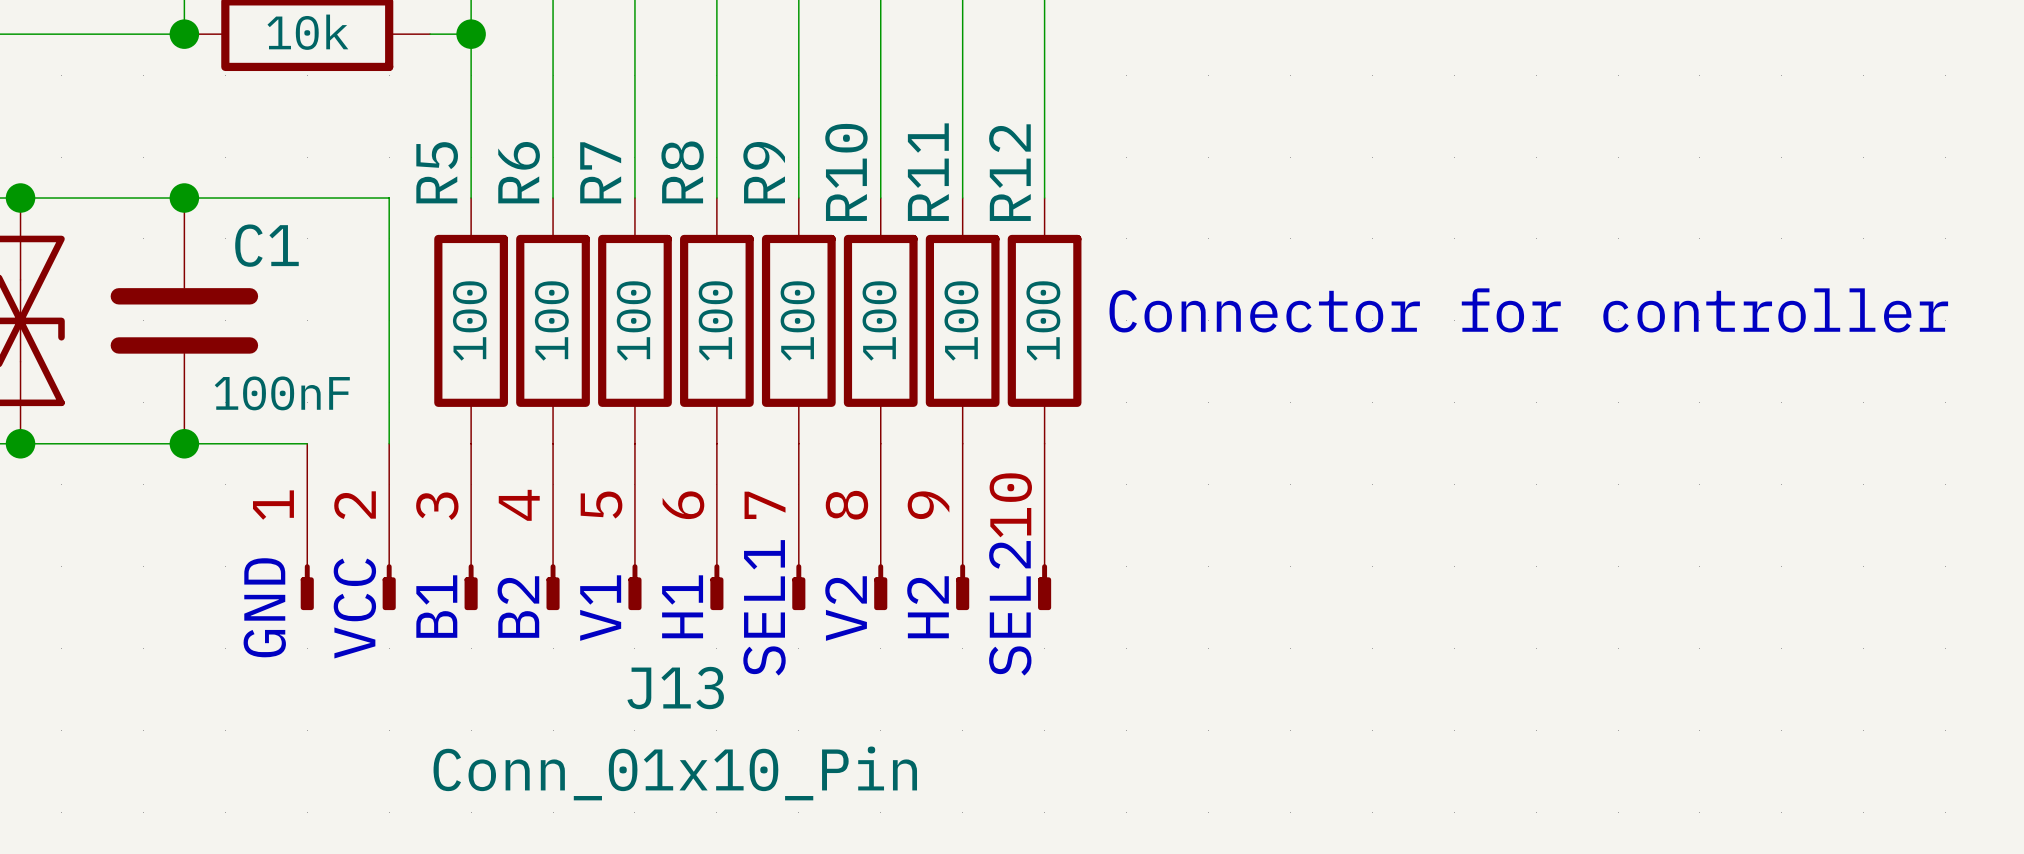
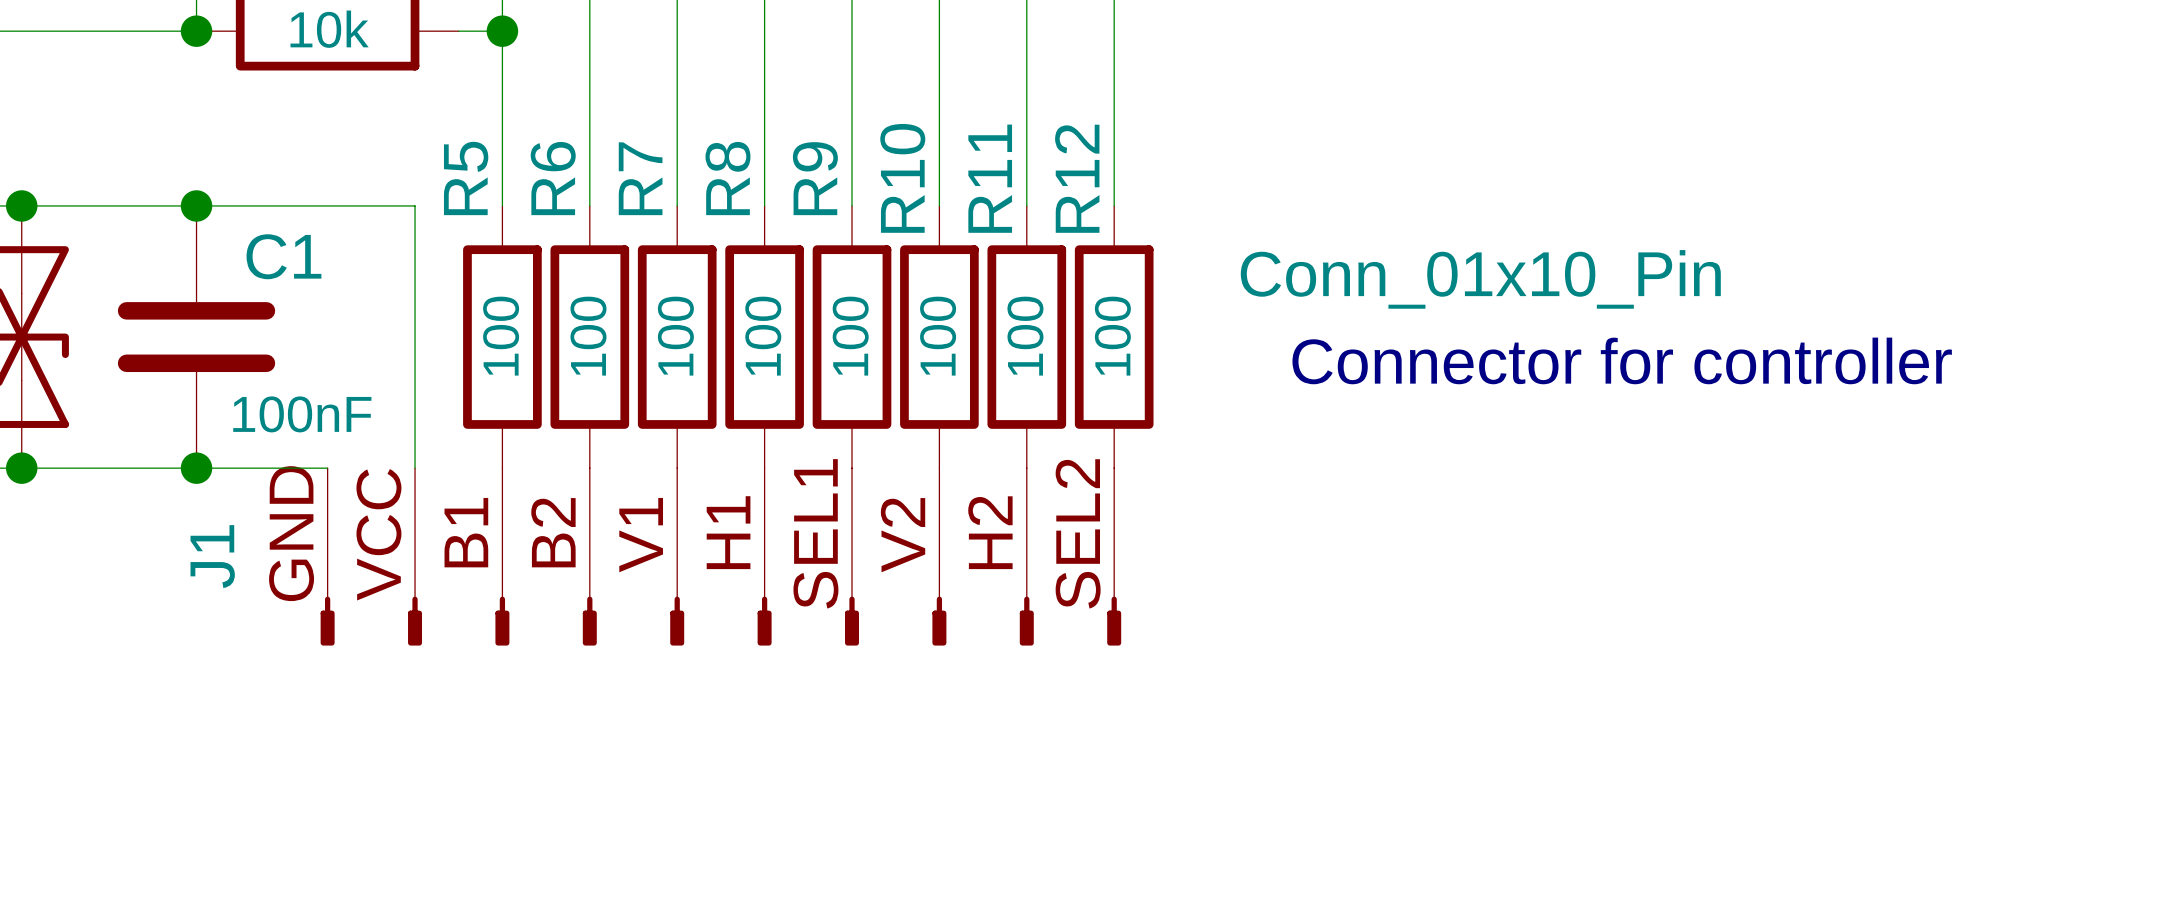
text position: Connector for controller (1528, 310) -> Connector for controller (1622, 360)
J13 symbol: [300, 443, 1052, 611] -> [320, 468, 1122, 646]
text: B1 (436, 606) -> none
text: H1 (682, 606) -> none
text: GND (264, 607) -> none
text: B2 (518, 607) -> none
text: SEL1 (764, 607) -> none
text: H2 (928, 607) -> none
text: VCC (354, 608) -> none
text: V1 (600, 608) -> none
text: V2 (846, 608) -> none
text: SEL2 (1010, 608) -> none
J13 name: J13 (675, 688) -> J1 (212, 556)
J13 value position: Conn_01x10_Pin (675, 773) -> Conn_01x10_Pin (1480, 279)

